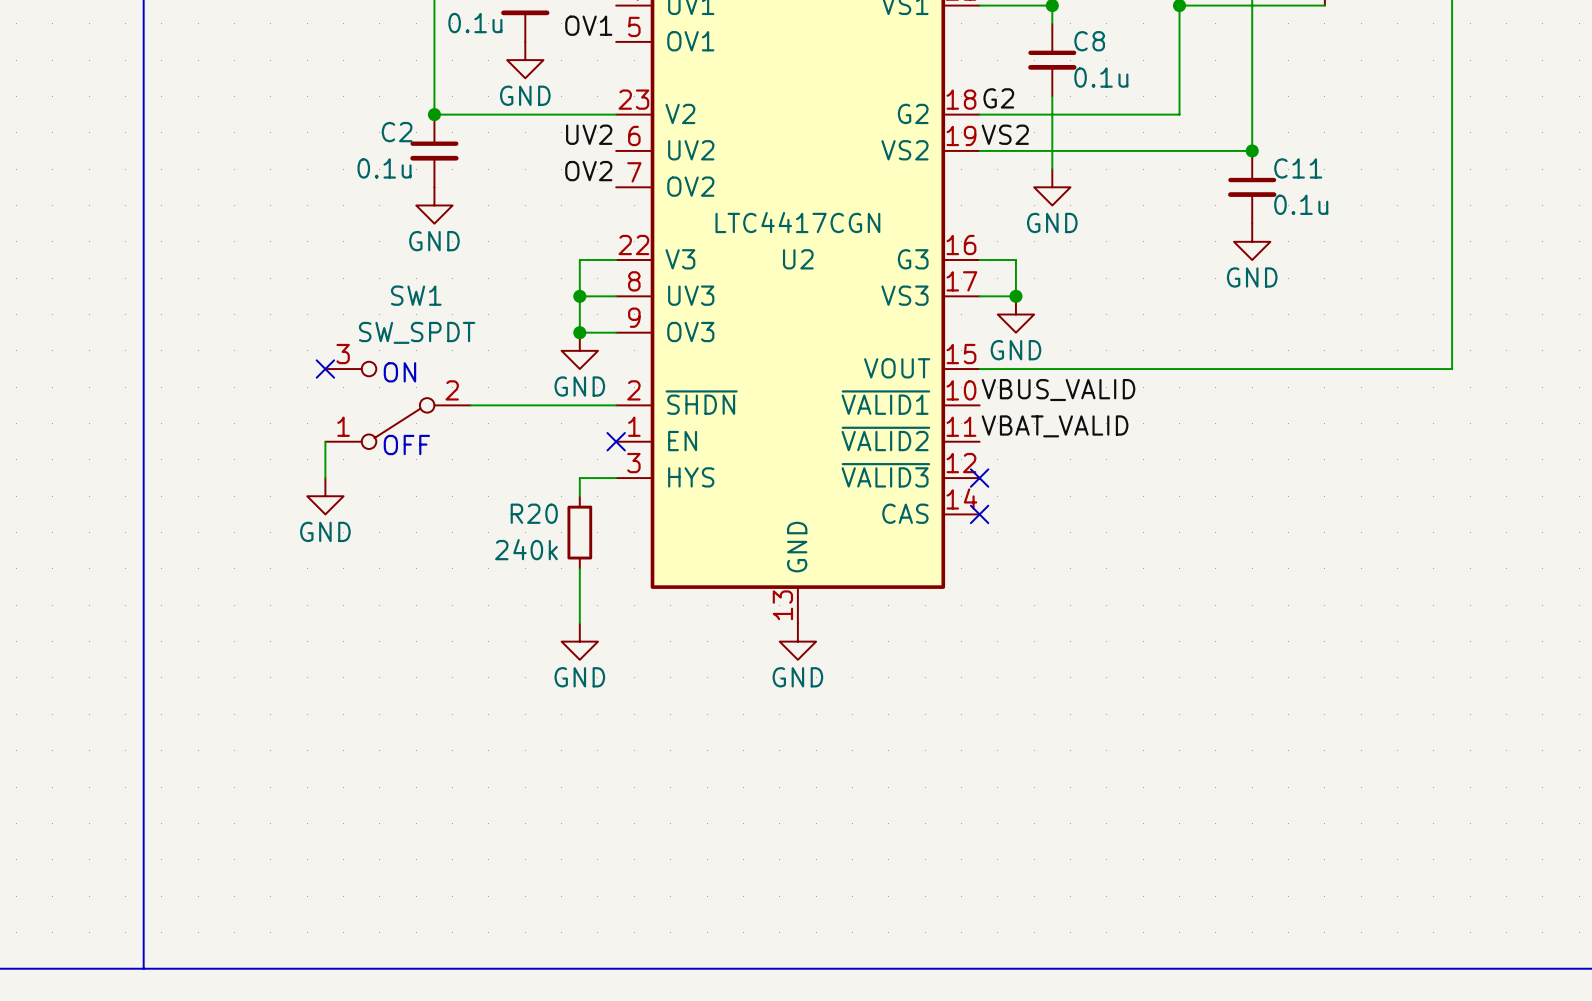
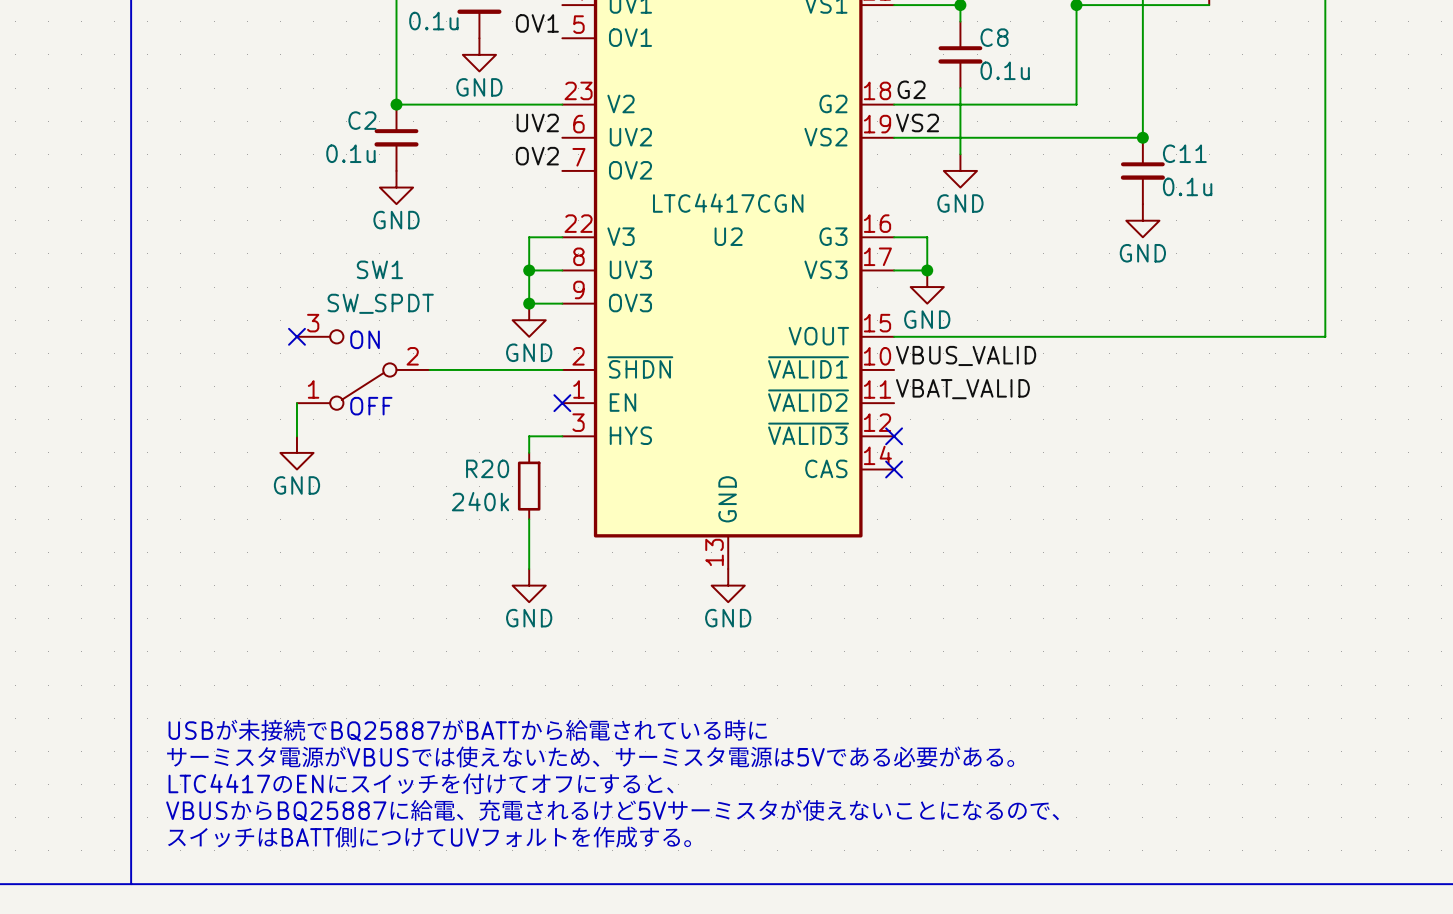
text: none -> USBが未接続でBQ25887がBATTから給電されている時に (468, 730)
text: none -> サーミスタ電源がVBUSでは使えないため、サーミスタ電源は5Vである必要がある。 (590, 756)
text: none -> LTC4417のENにスイッチを付けてオフにすると、 (421, 783)
text: none -> VBUSからBQ25887に給電、充電されるけど5Vサーミスタが使えないことになるので、 (613, 810)
text: none -> スイッチはBATT側につけてUVフォルトを作成する。 (429, 837)

